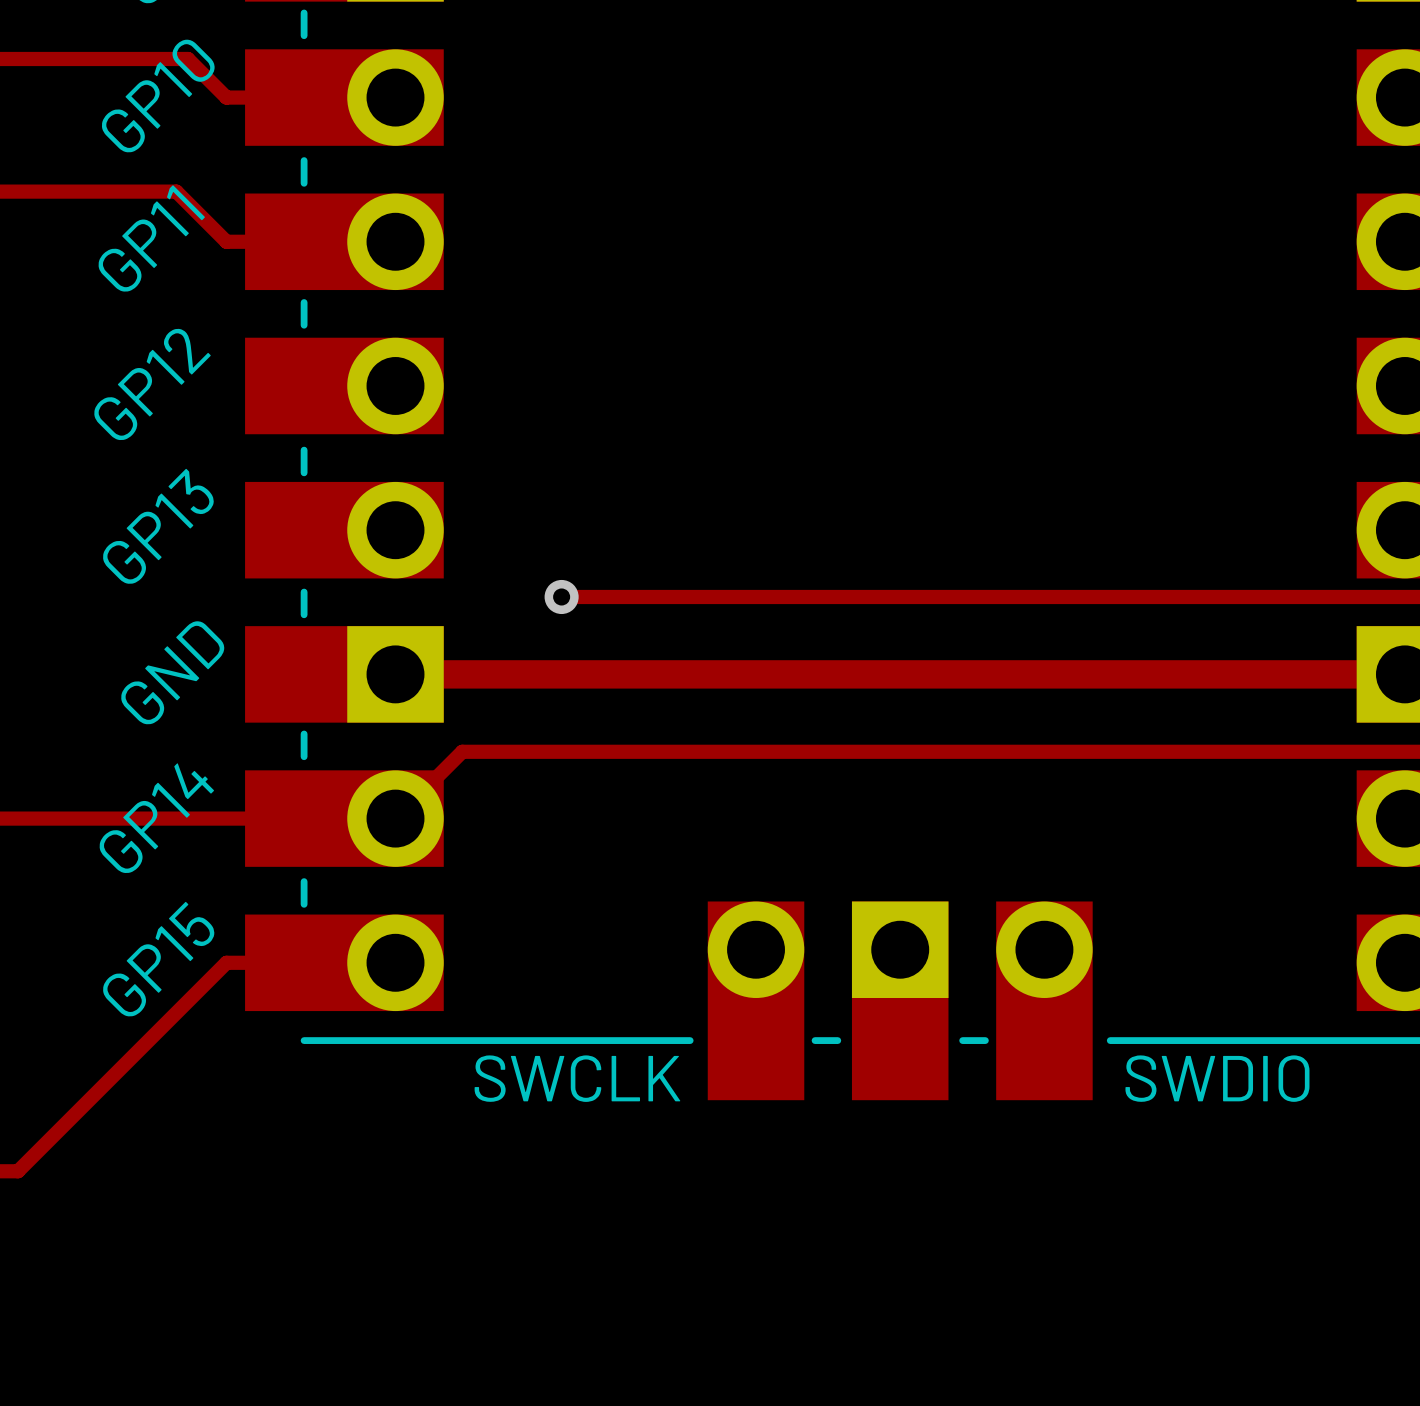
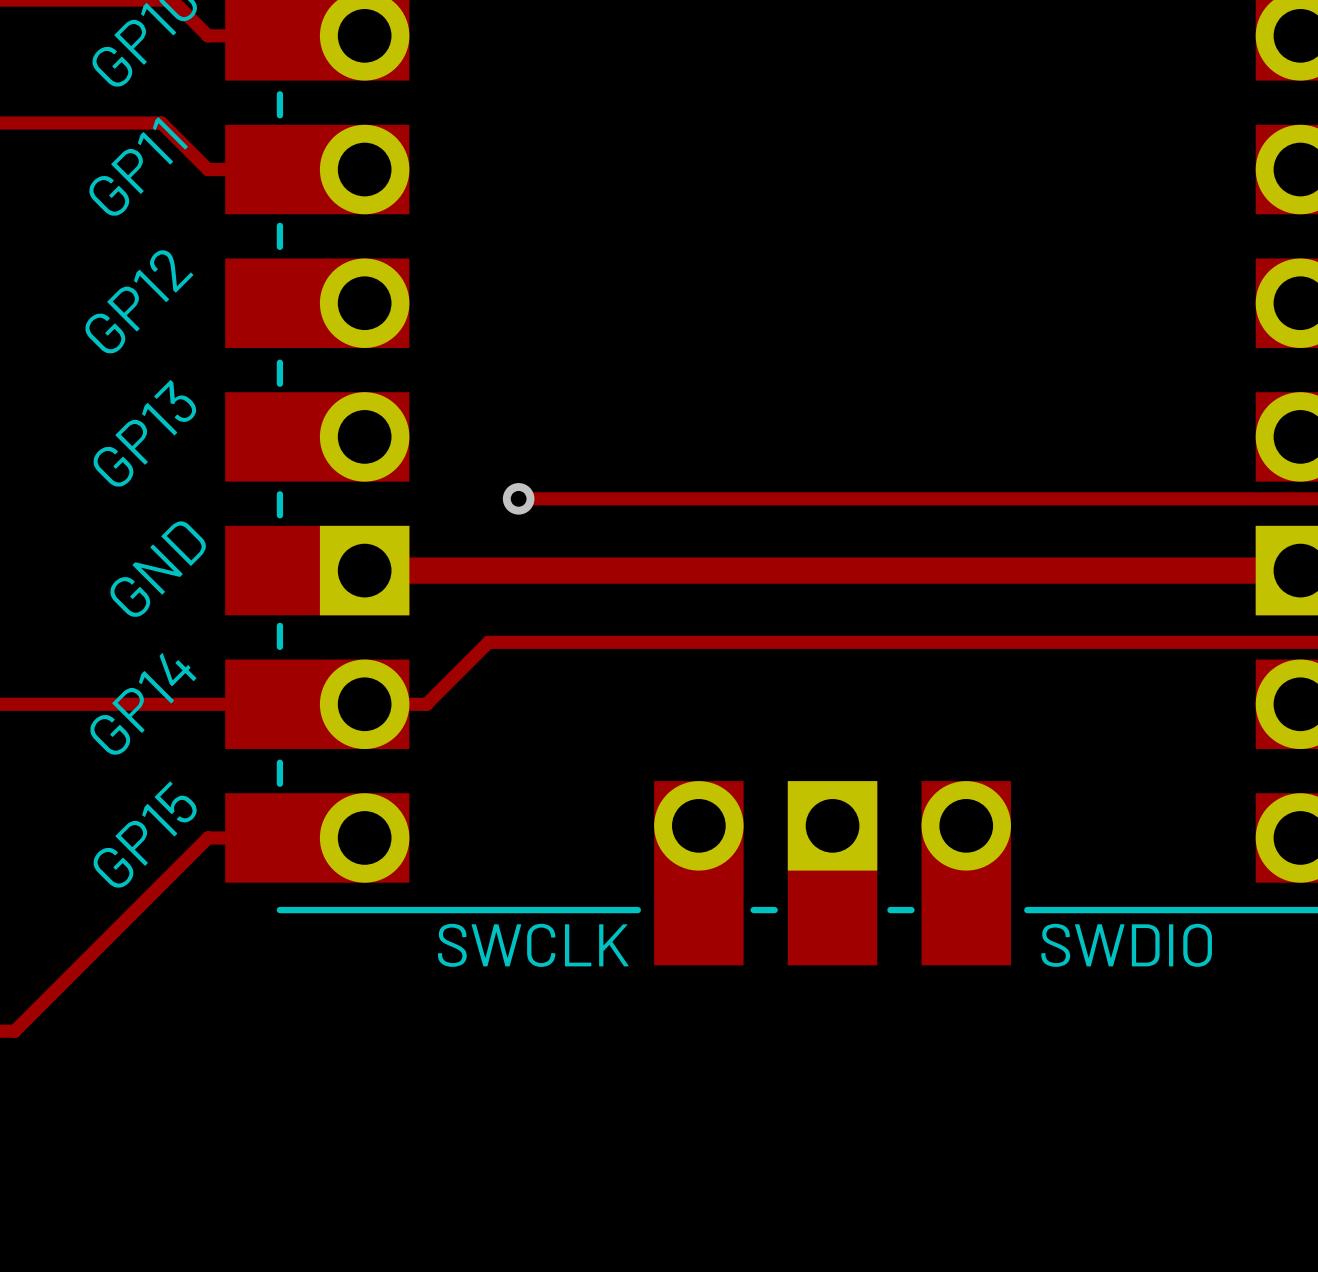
track: (529, 751) (462, 751) (395, 818) -> (488, 642) (426, 704) (364, 704)

